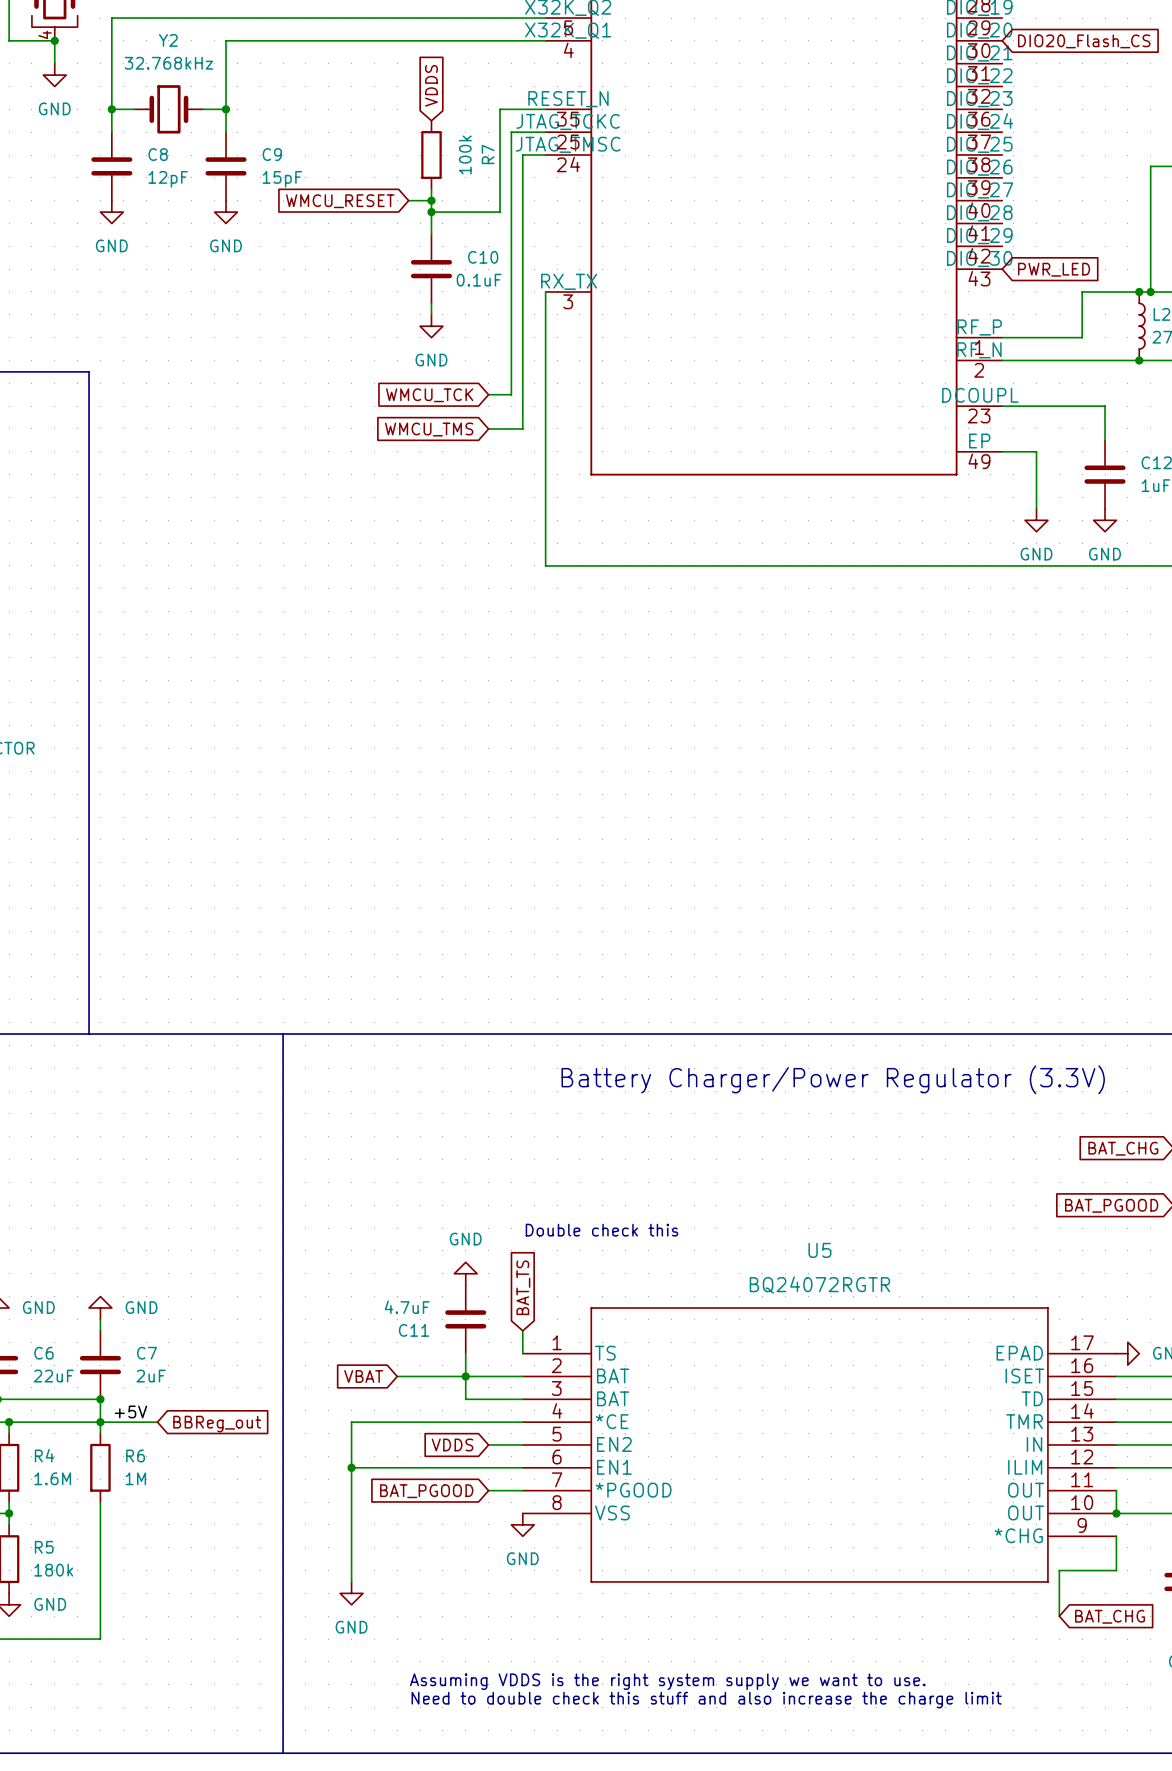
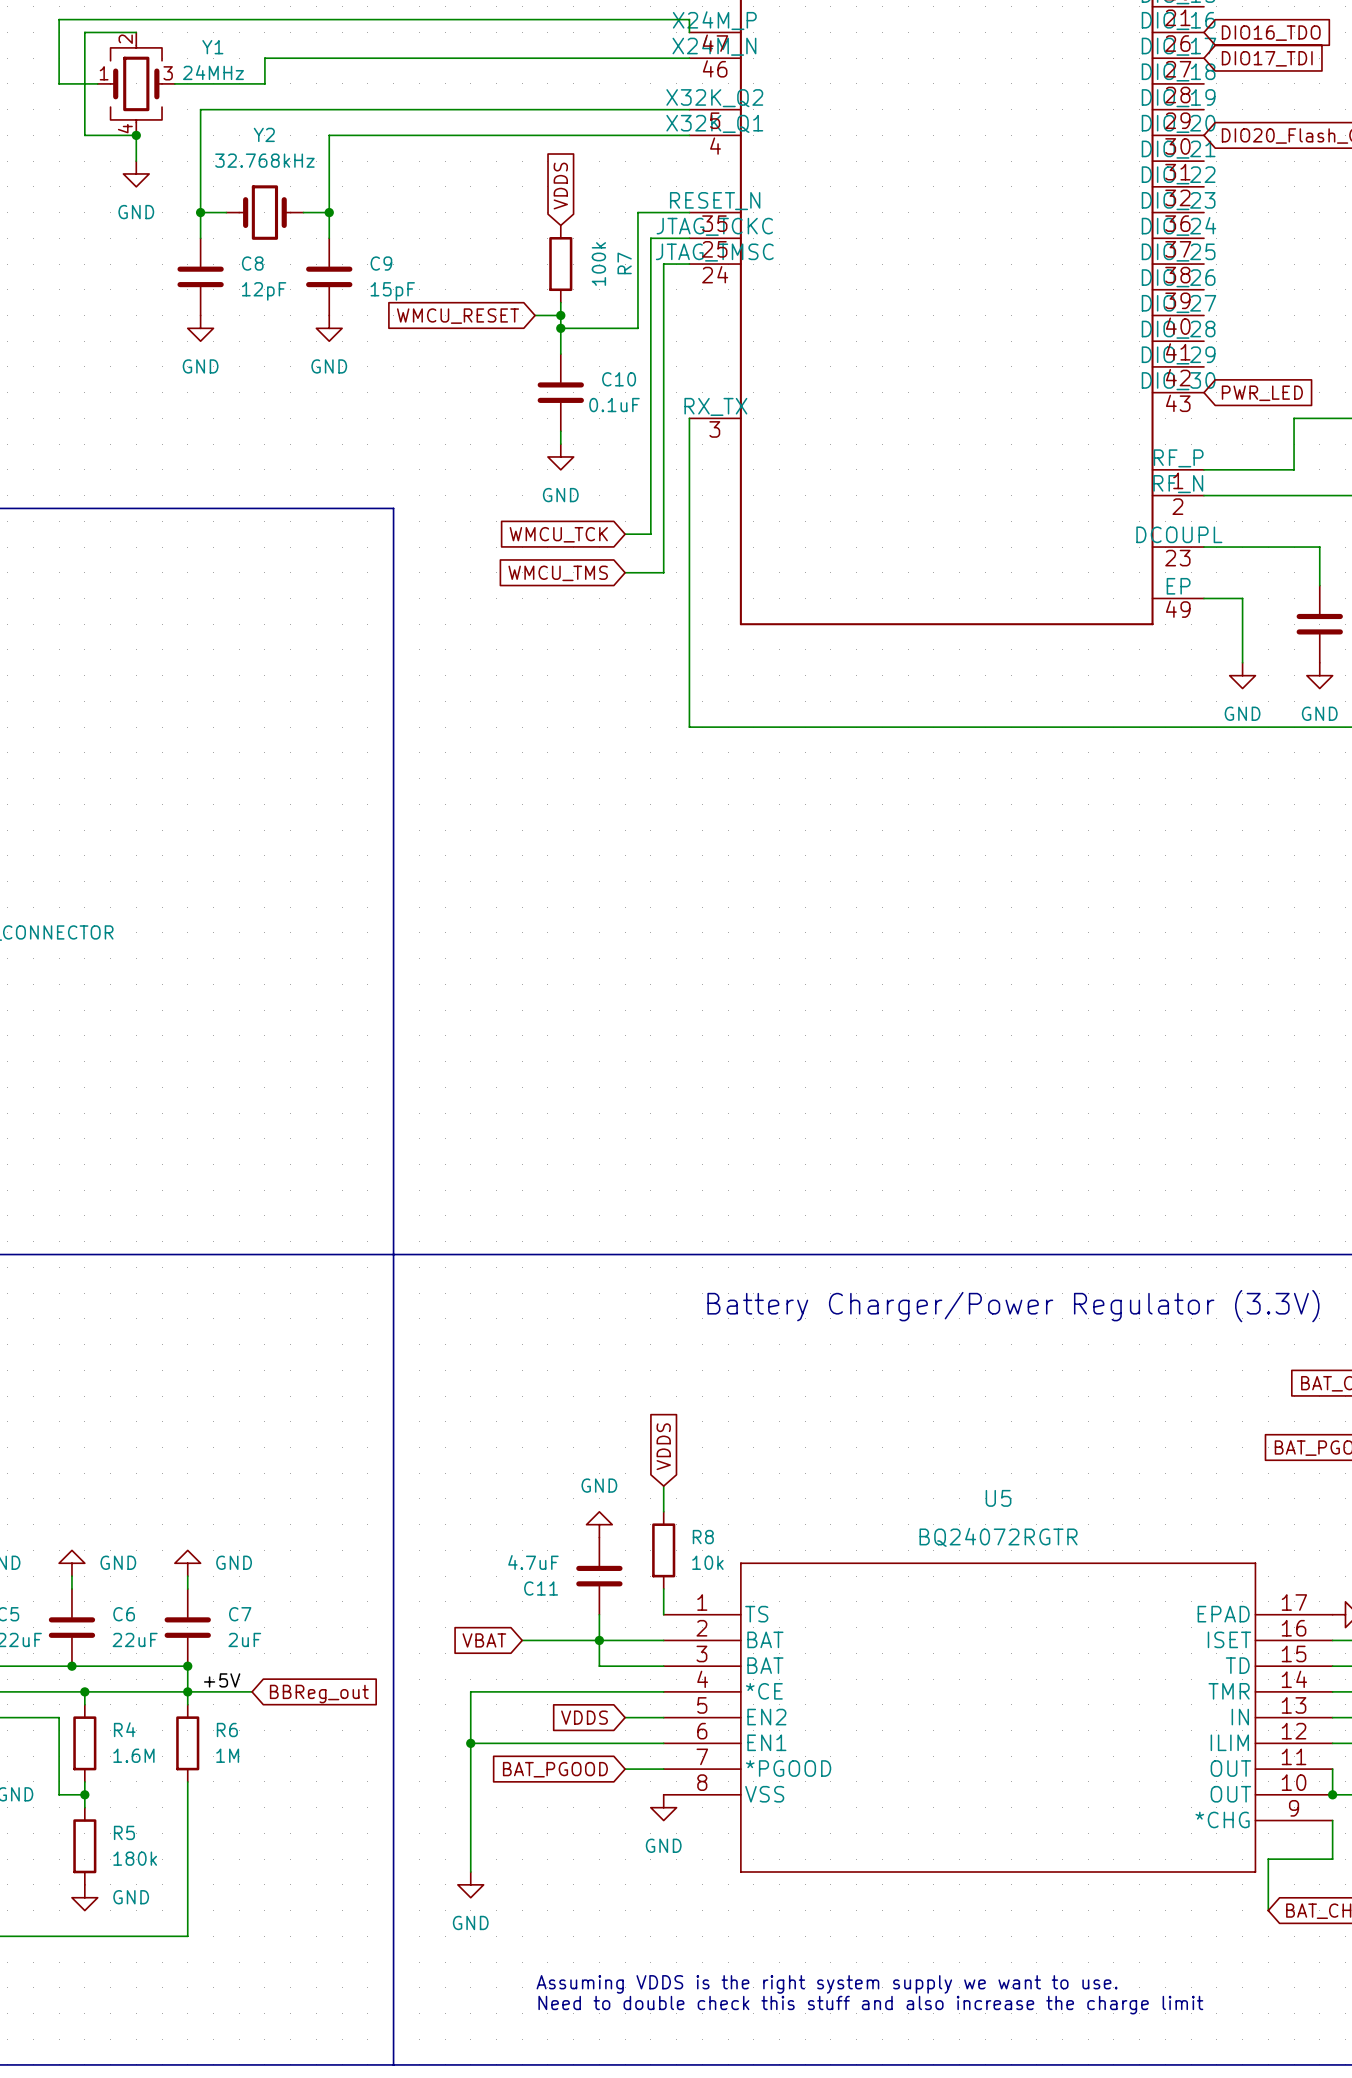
line: (89, 371) (89, 1034) -> (174, 508) (393, 508) (393, 1254)
global label: none -> VDDS (663, 1446)
text: Double check this (601, 1230) -> none
wire: none -> (663, 1486) (663, 1511)
global label: BAT_TS (523, 1287) -> none
R8: none -> 10k (663, 1550)

